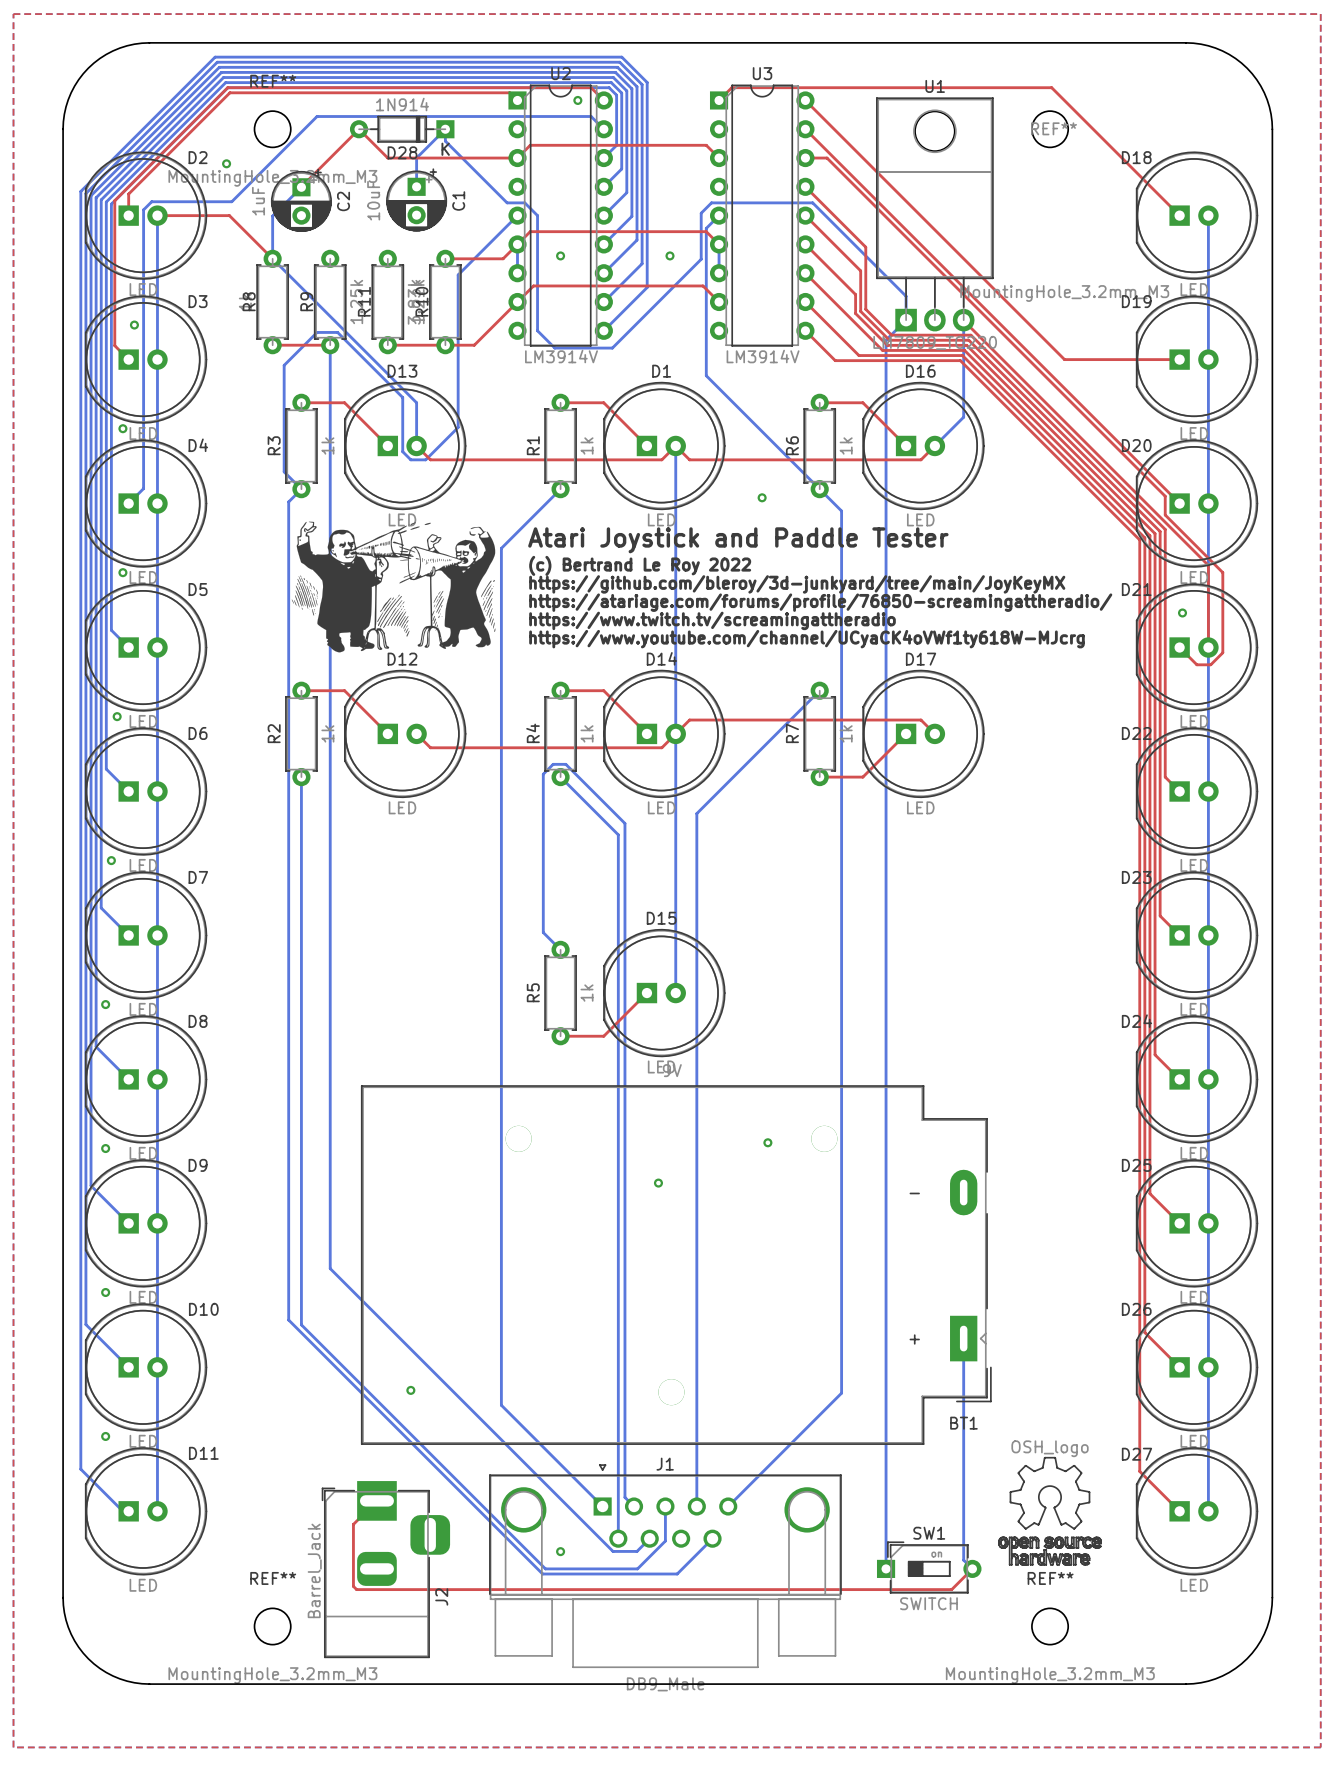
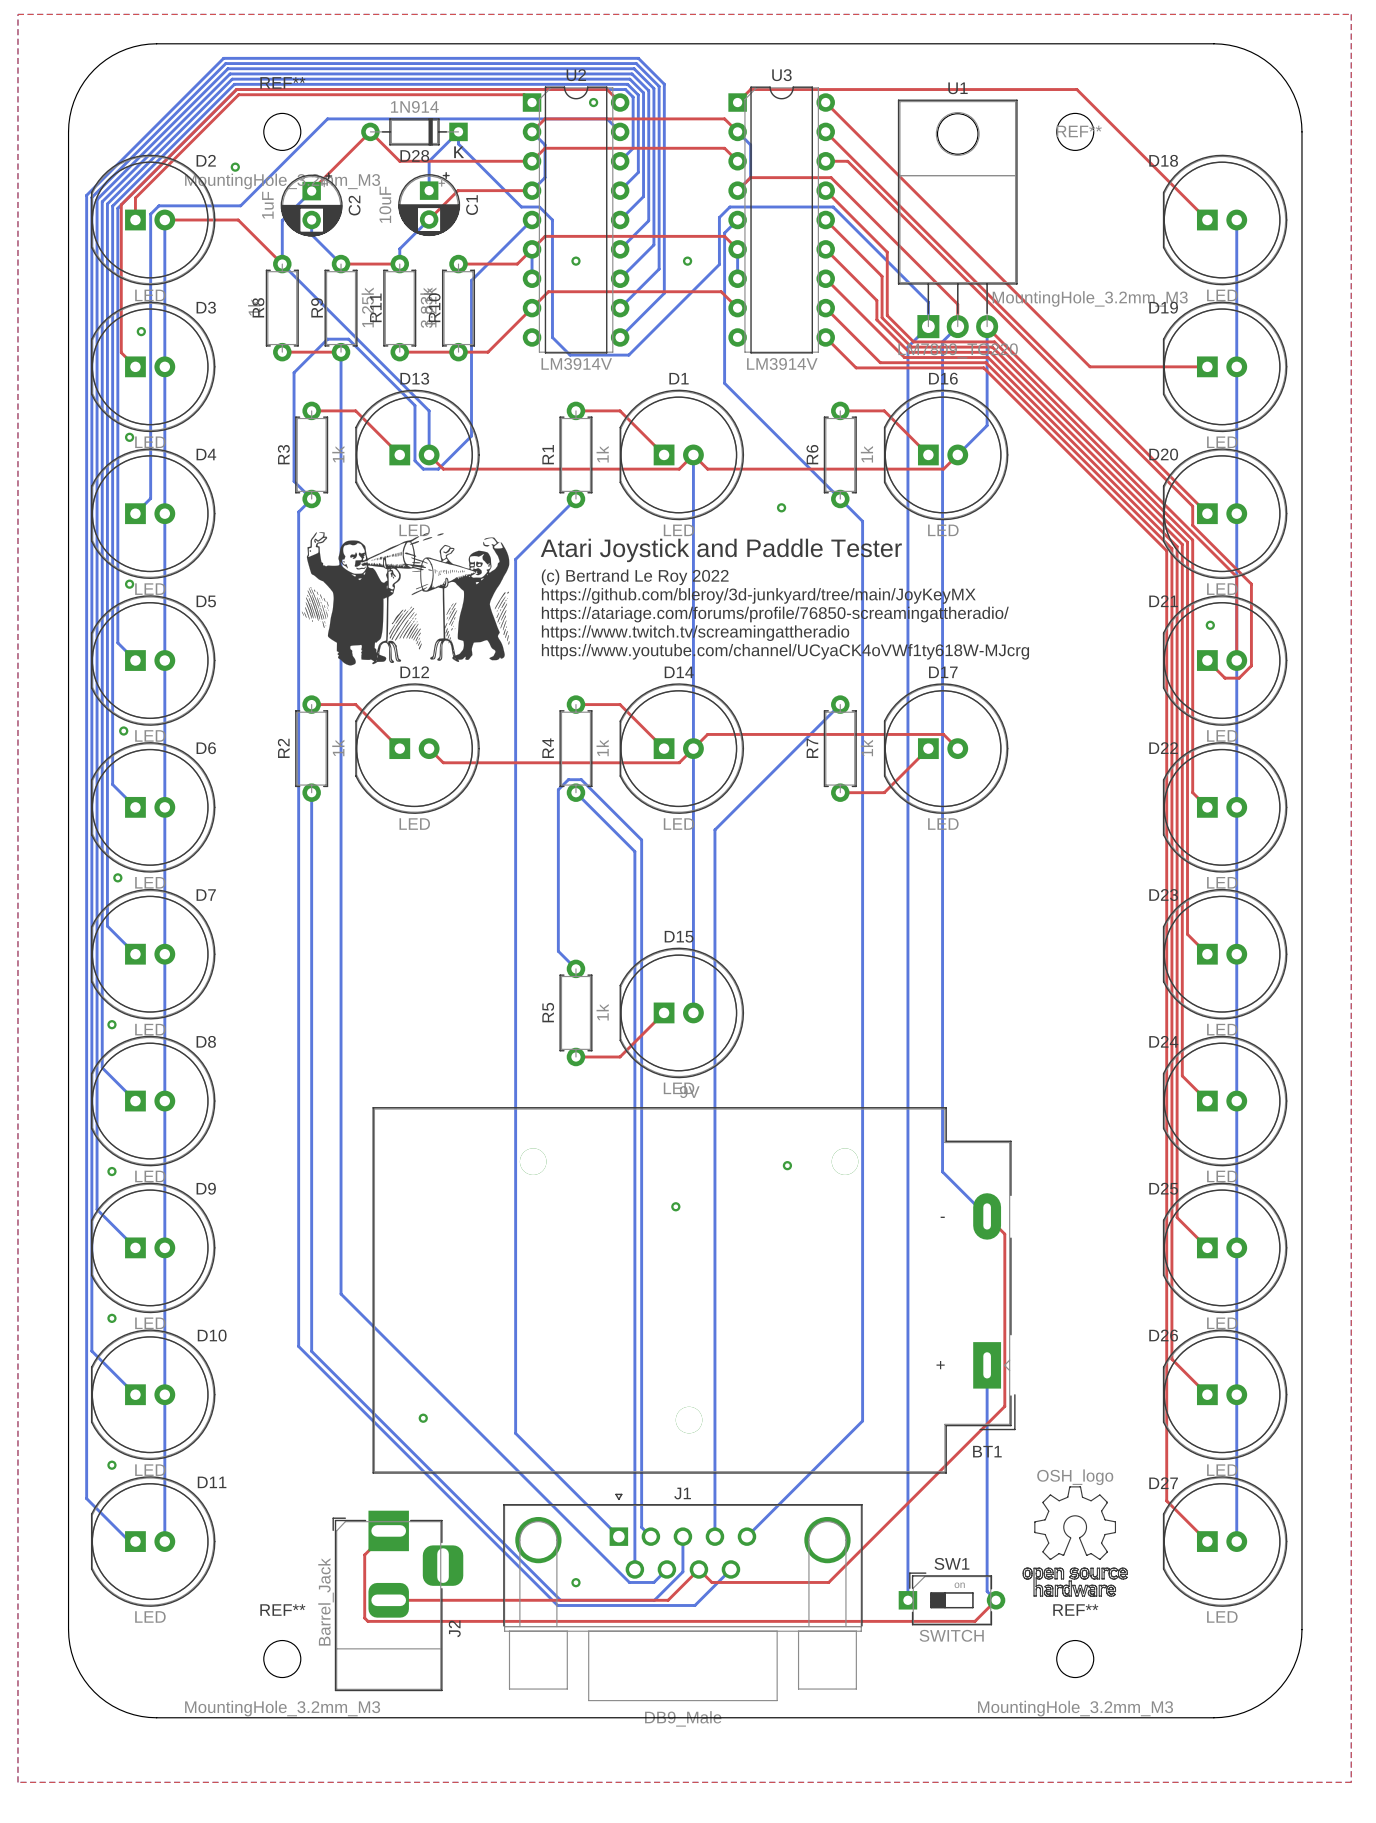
bottom track: none -> (532, 131) (545, 144) (545, 177) (532, 190)
top track: none -> (532, 131) (545, 118) (724, 118) (737, 131)
bottom track: none -> (737, 131) (750, 144) (750, 177) (737, 190)
top track: none -> (532, 190) (458, 190) (429, 219)
top track: none -> (737, 190) (750, 177) (831, 177) (957, 304) (957, 326)
bottom track: none -> (311, 220) (311, 234) (341, 264)
bottom track: none -> (429, 219) (399, 248) (399, 264)
top track: none -> (341, 264) (399, 264)
bottom track: none -> (957, 326) (942, 341) (942, 1171) (987, 1216)
top track: none -> (987, 1216) (1004, 1234) (1004, 1406) (828, 1582) (711, 1582) (698, 1569) (668, 1600) (388, 1600)

